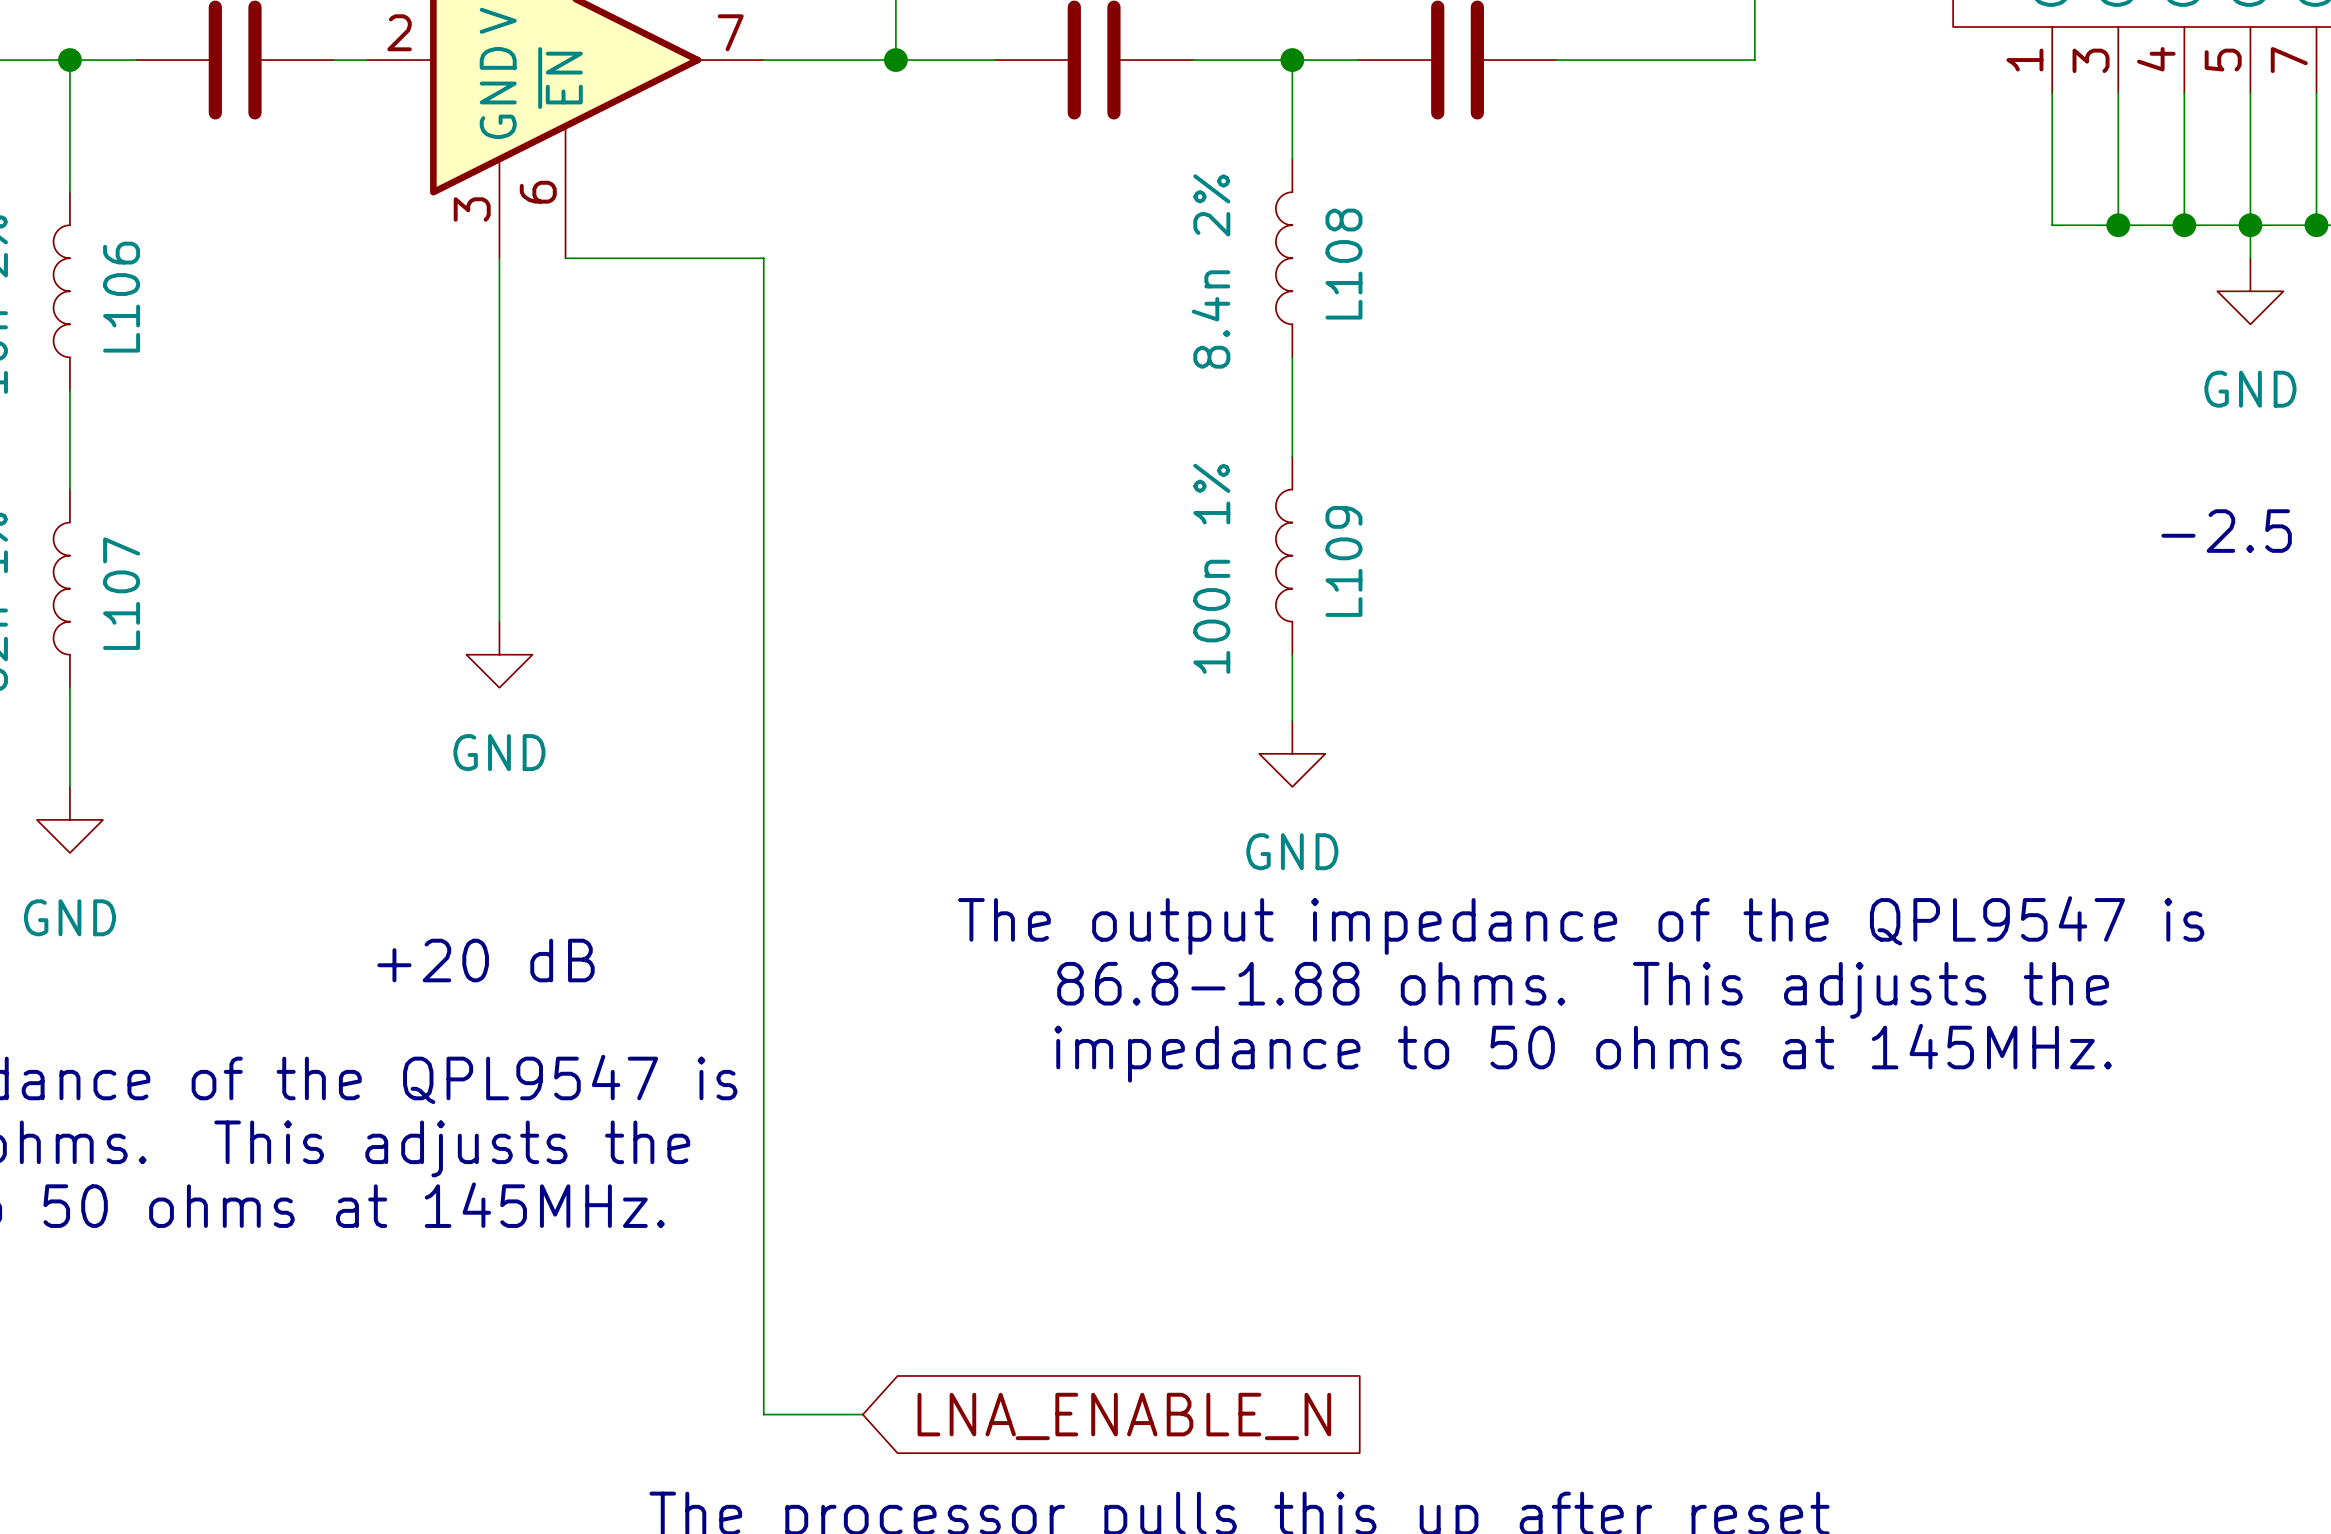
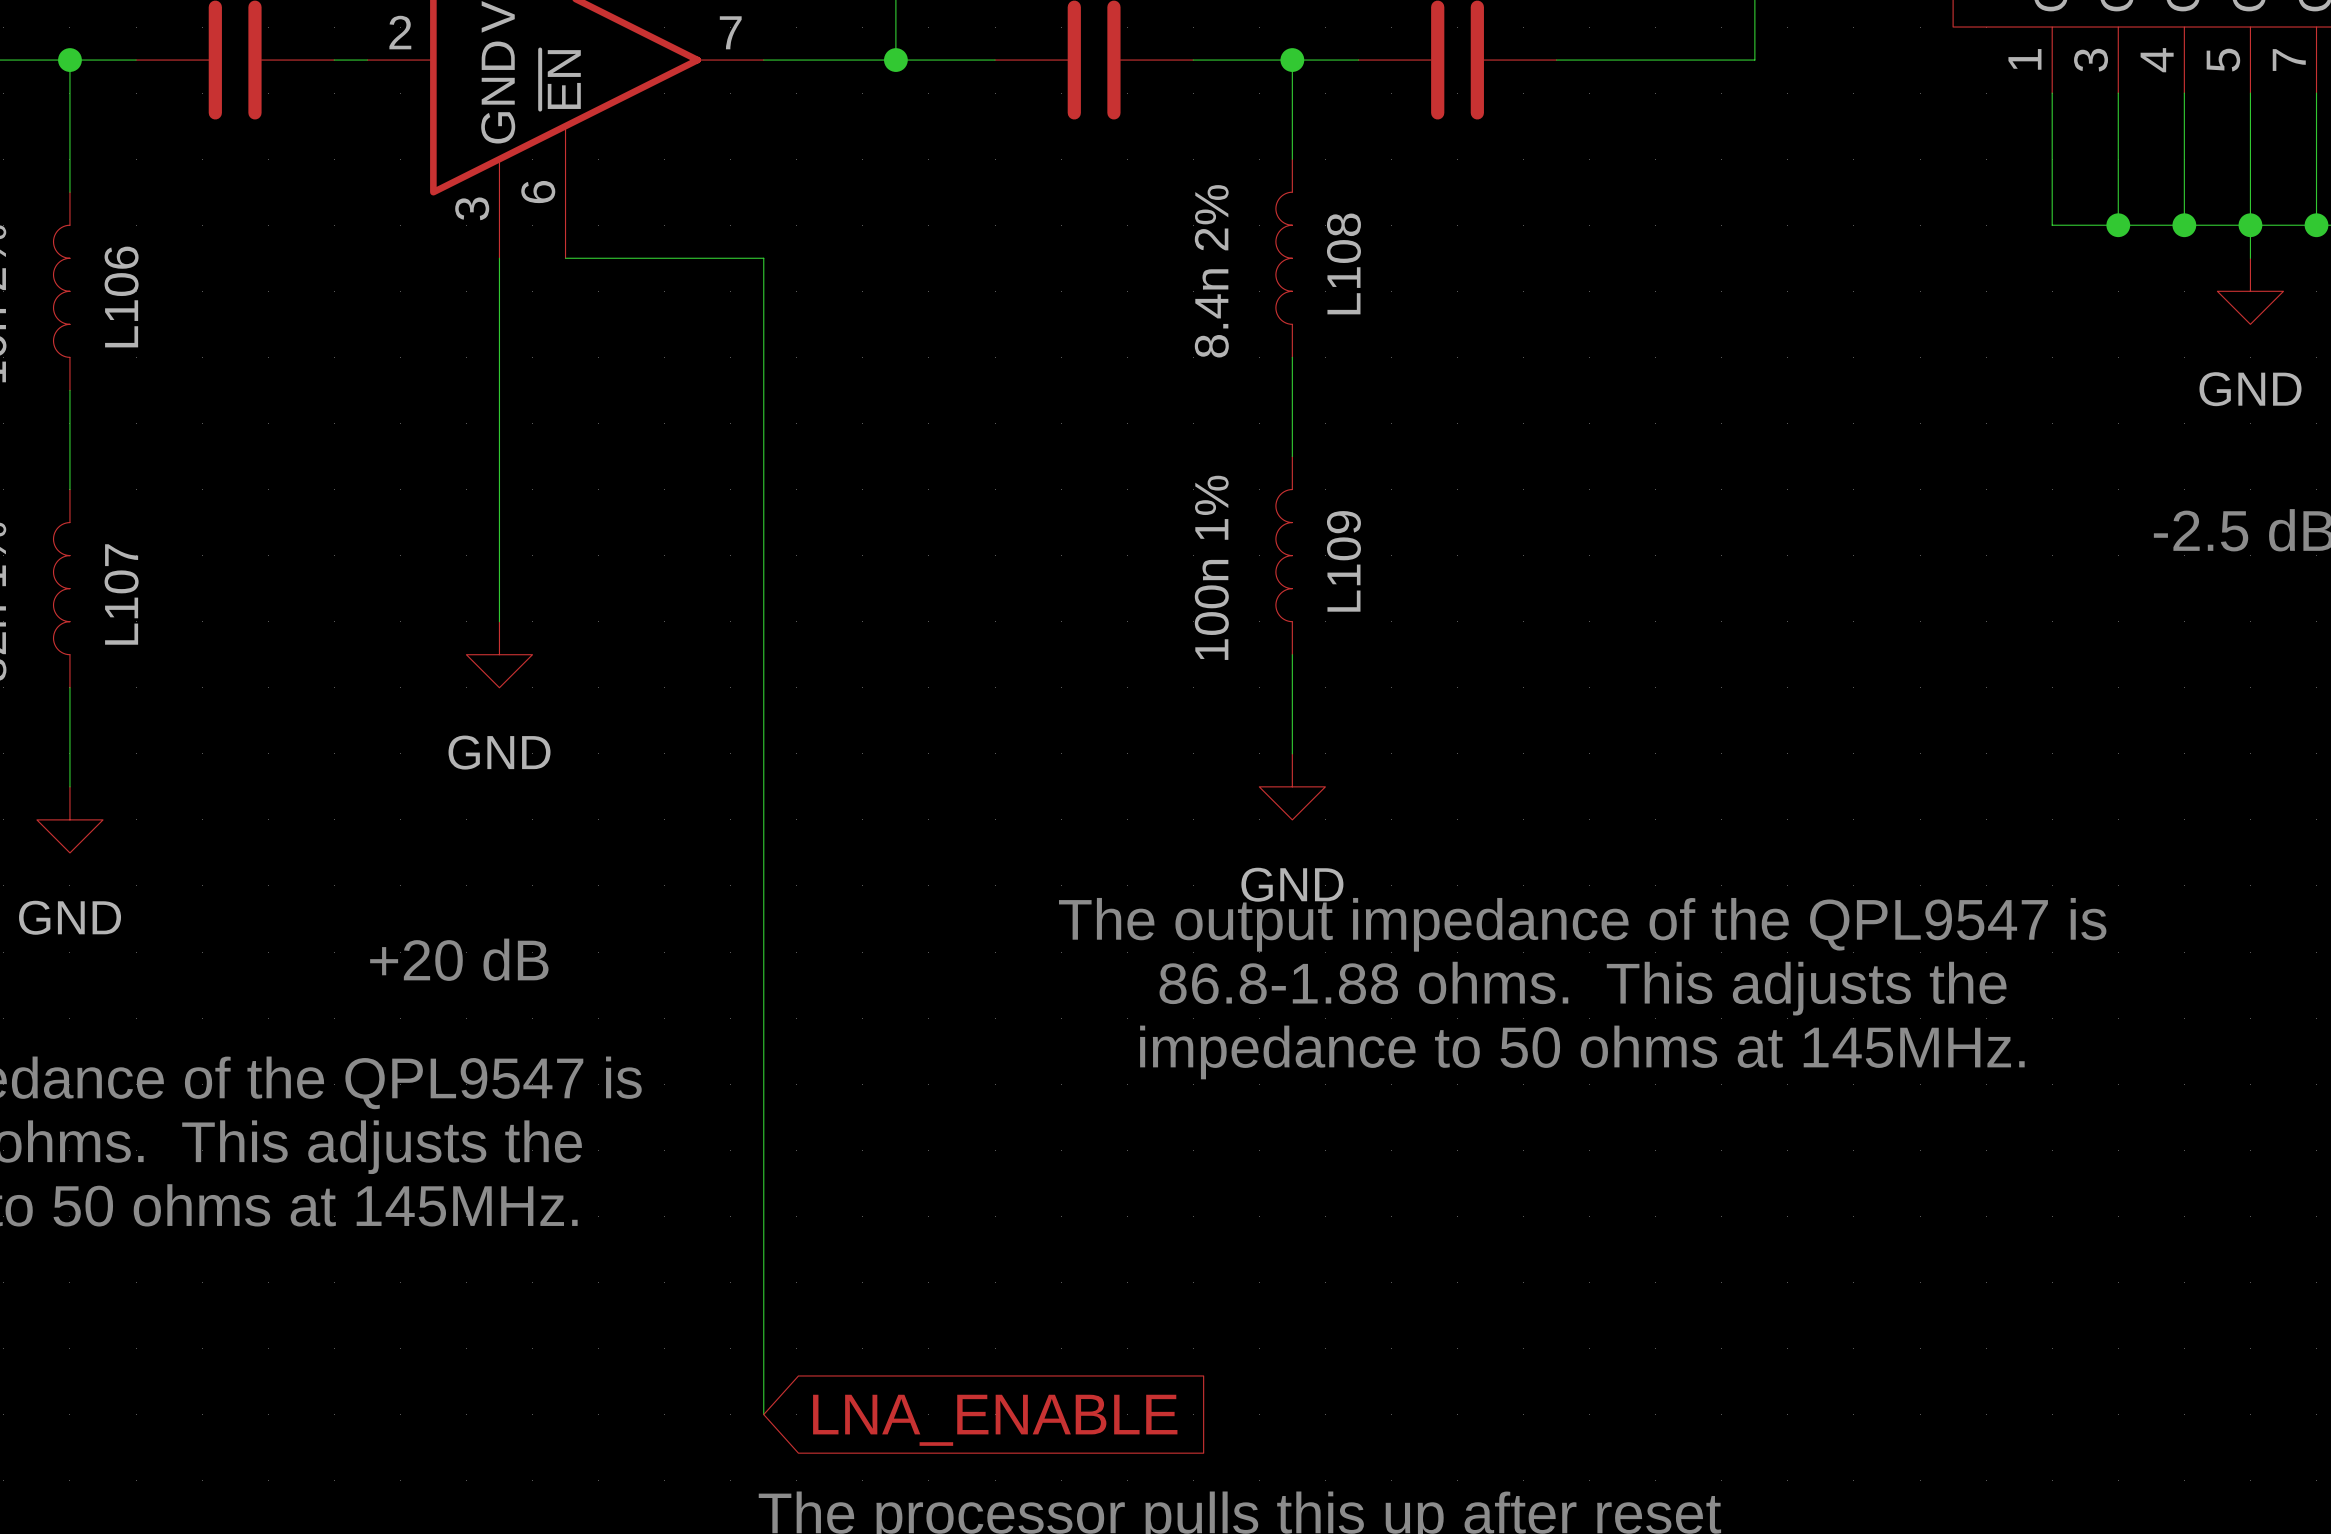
power symbol position: GND (1292, 753) -> GND (1292, 786)
wire: (763, 1414) (862, 1414) -> none
global label: LNA_ENABLE_N (1124, 1416) -> LNA_ENABLE (995, 1420)

